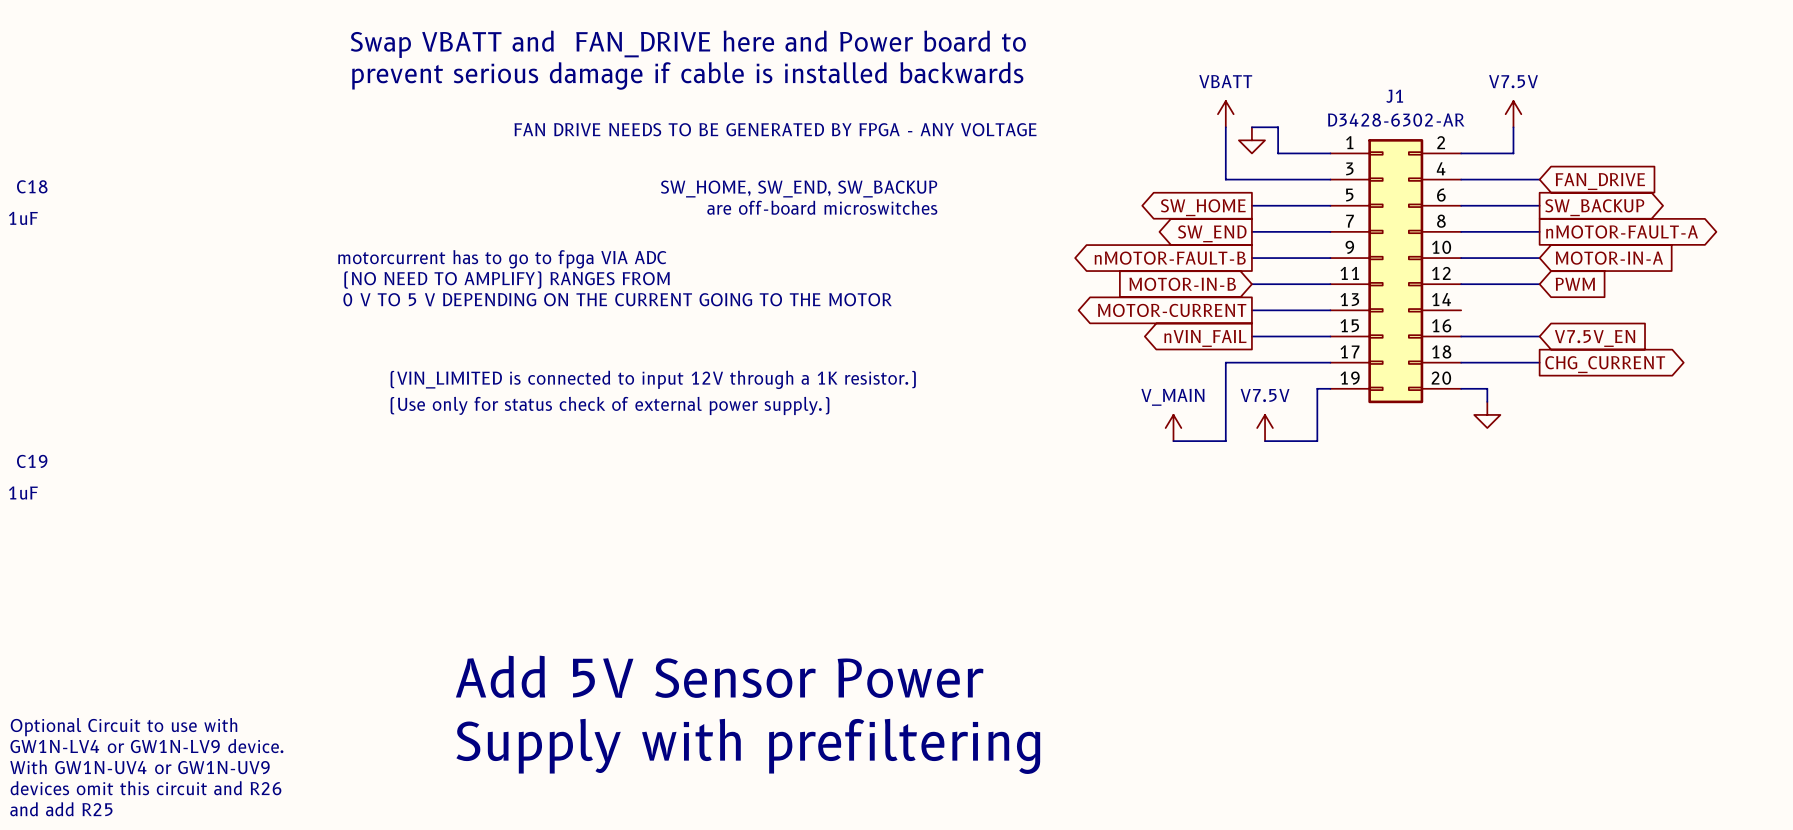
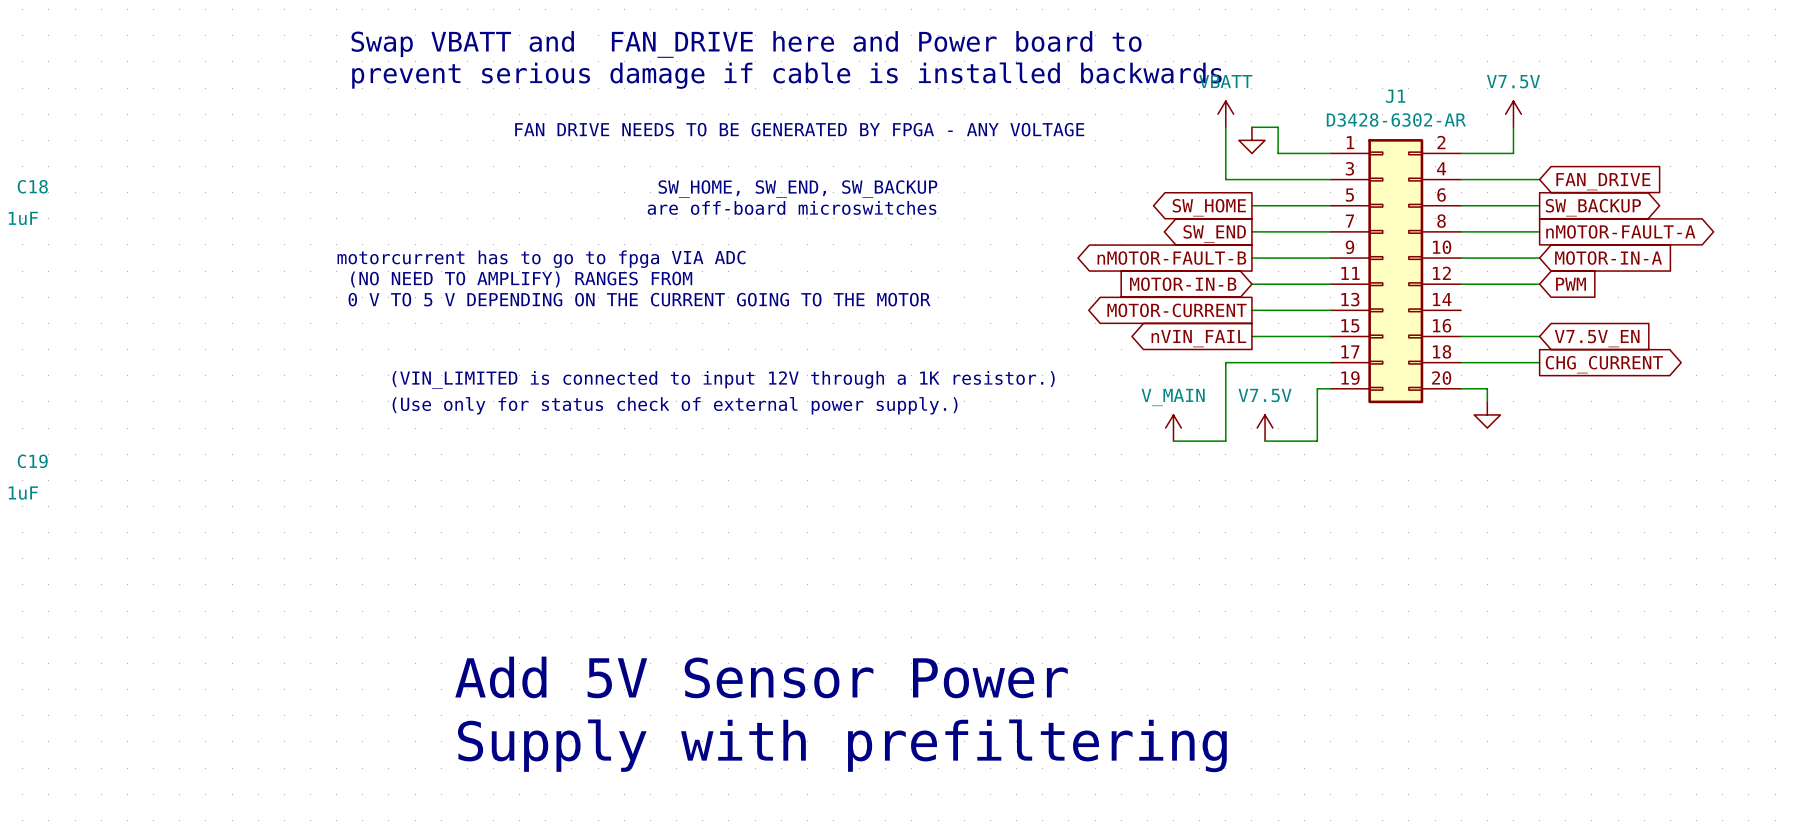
text: Optional Circuit to use with (124, 727) -> none
text: GW1N-LV4 or GW1N-LV9 device. (146, 746) -> none
text: With GW1N-UV4 or GW1N-UV9 (139, 767) -> none
text: devices omit this circuit and R26 (146, 788) -> none
text: and add R25 (61, 809) -> none

